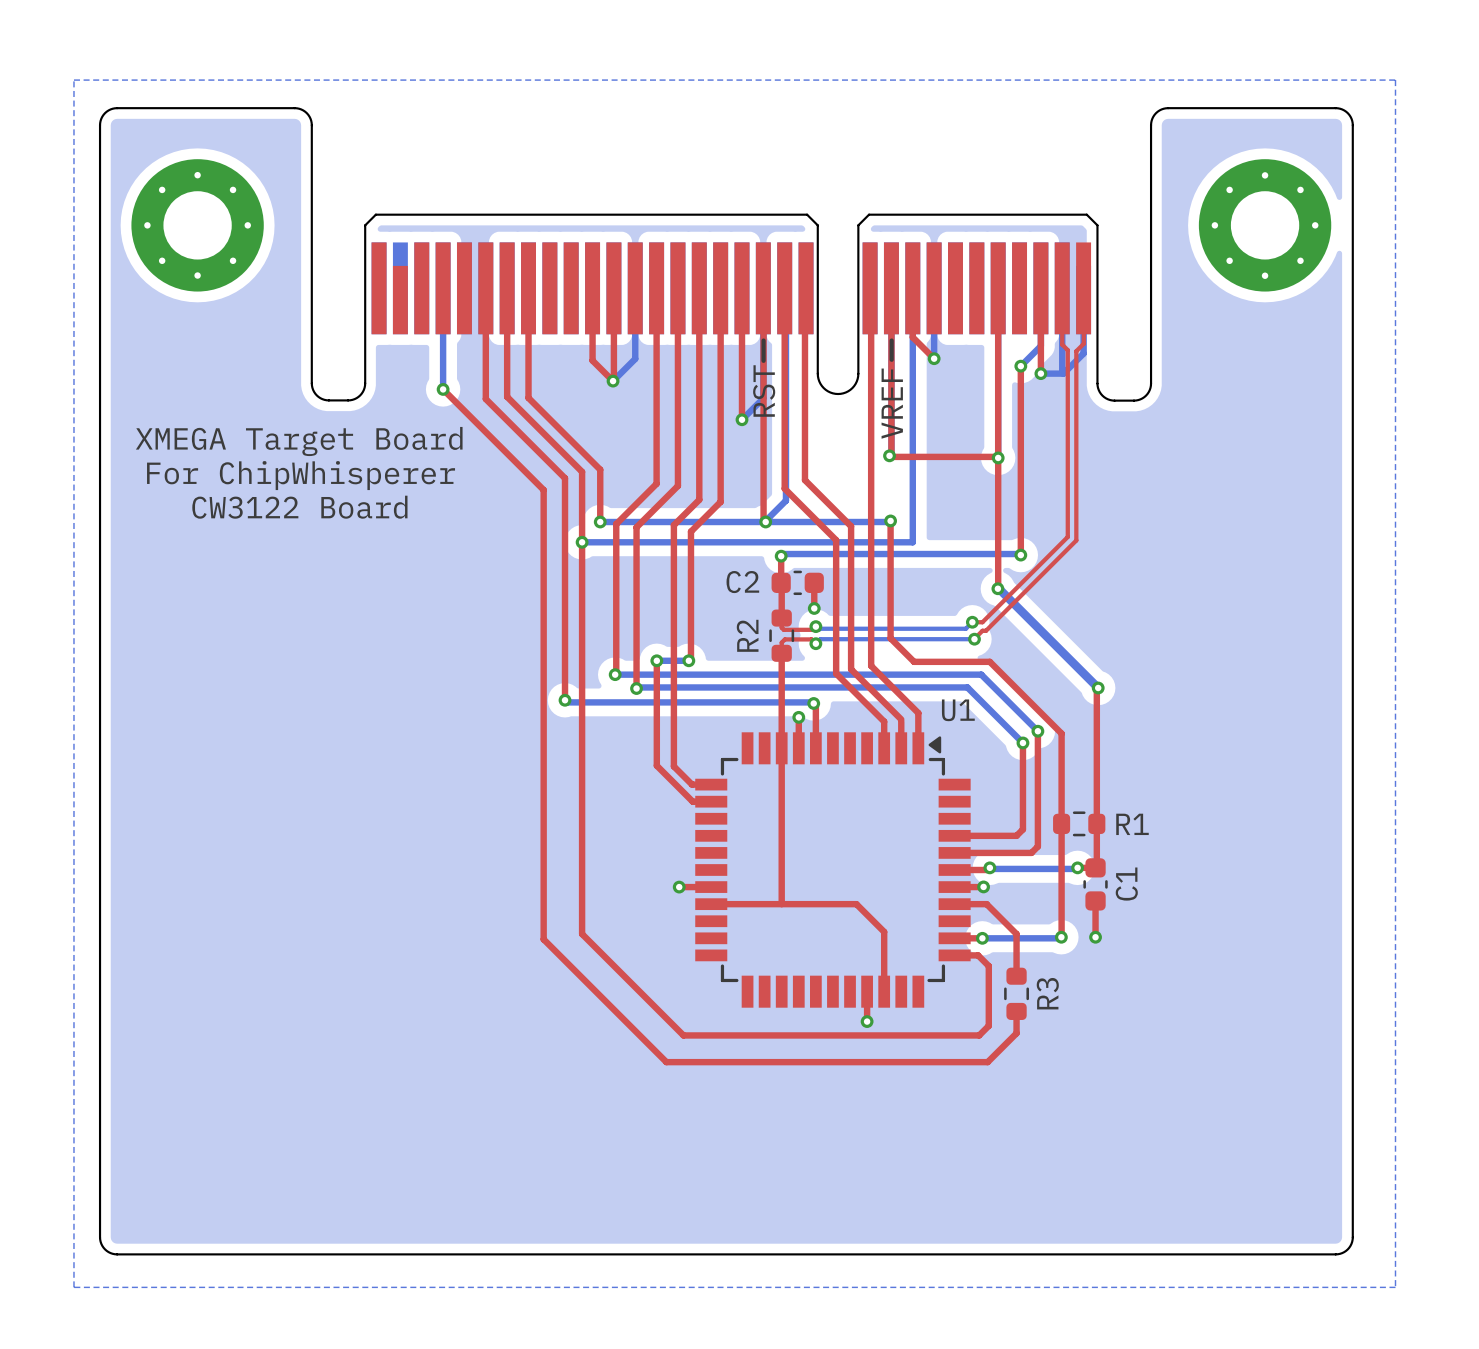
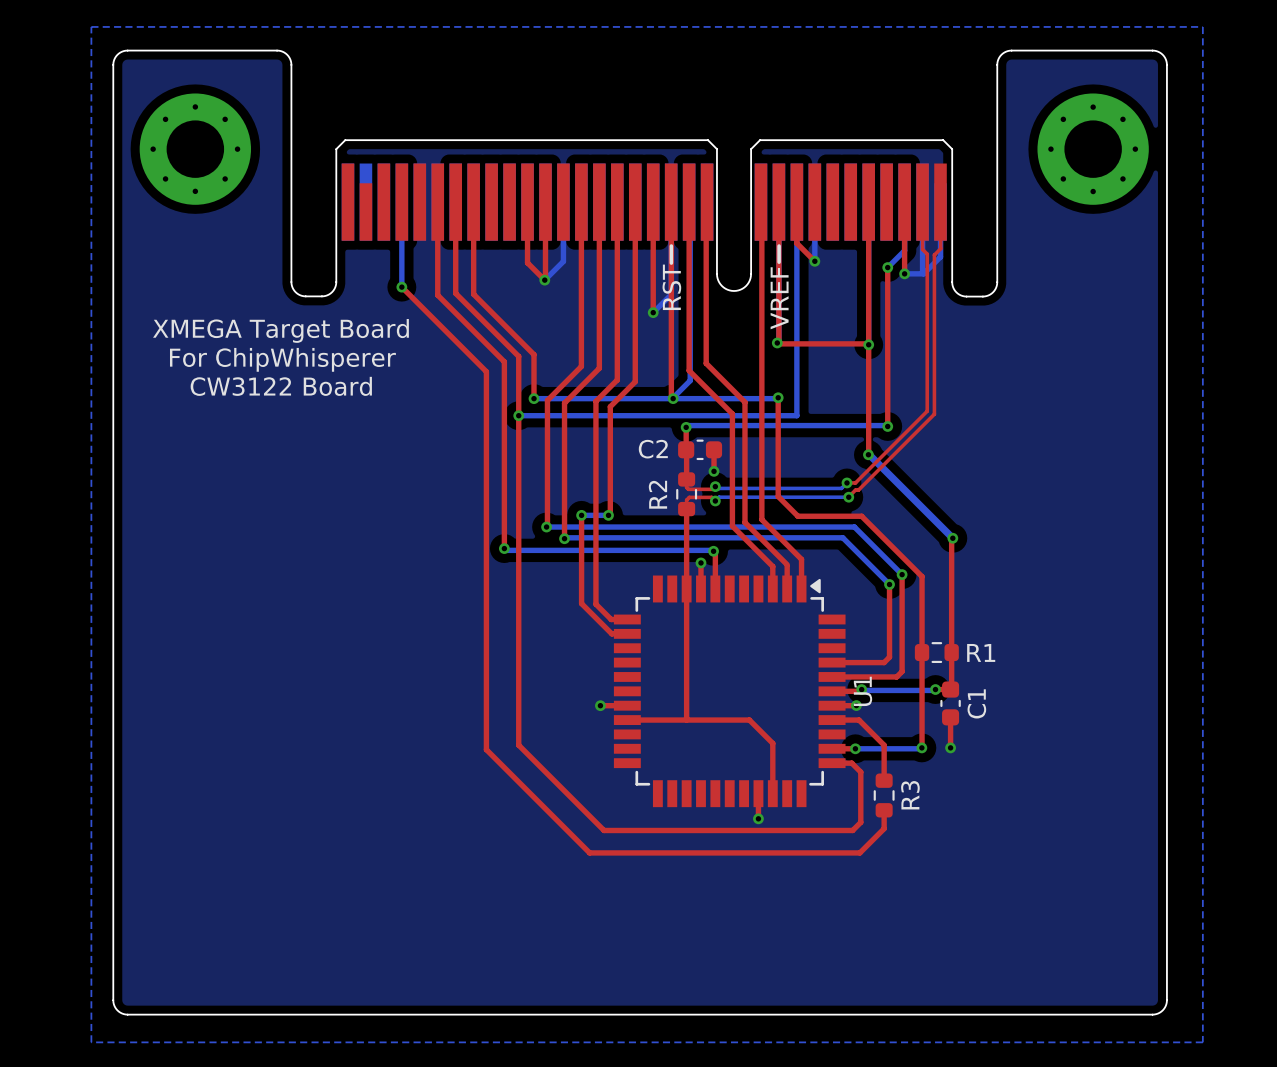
U1 name rotation: 0° (958, 710) -> 90° counterclockwise (862, 691)
U1 name position: U1 (958, 710) -> U1 (862, 691)

